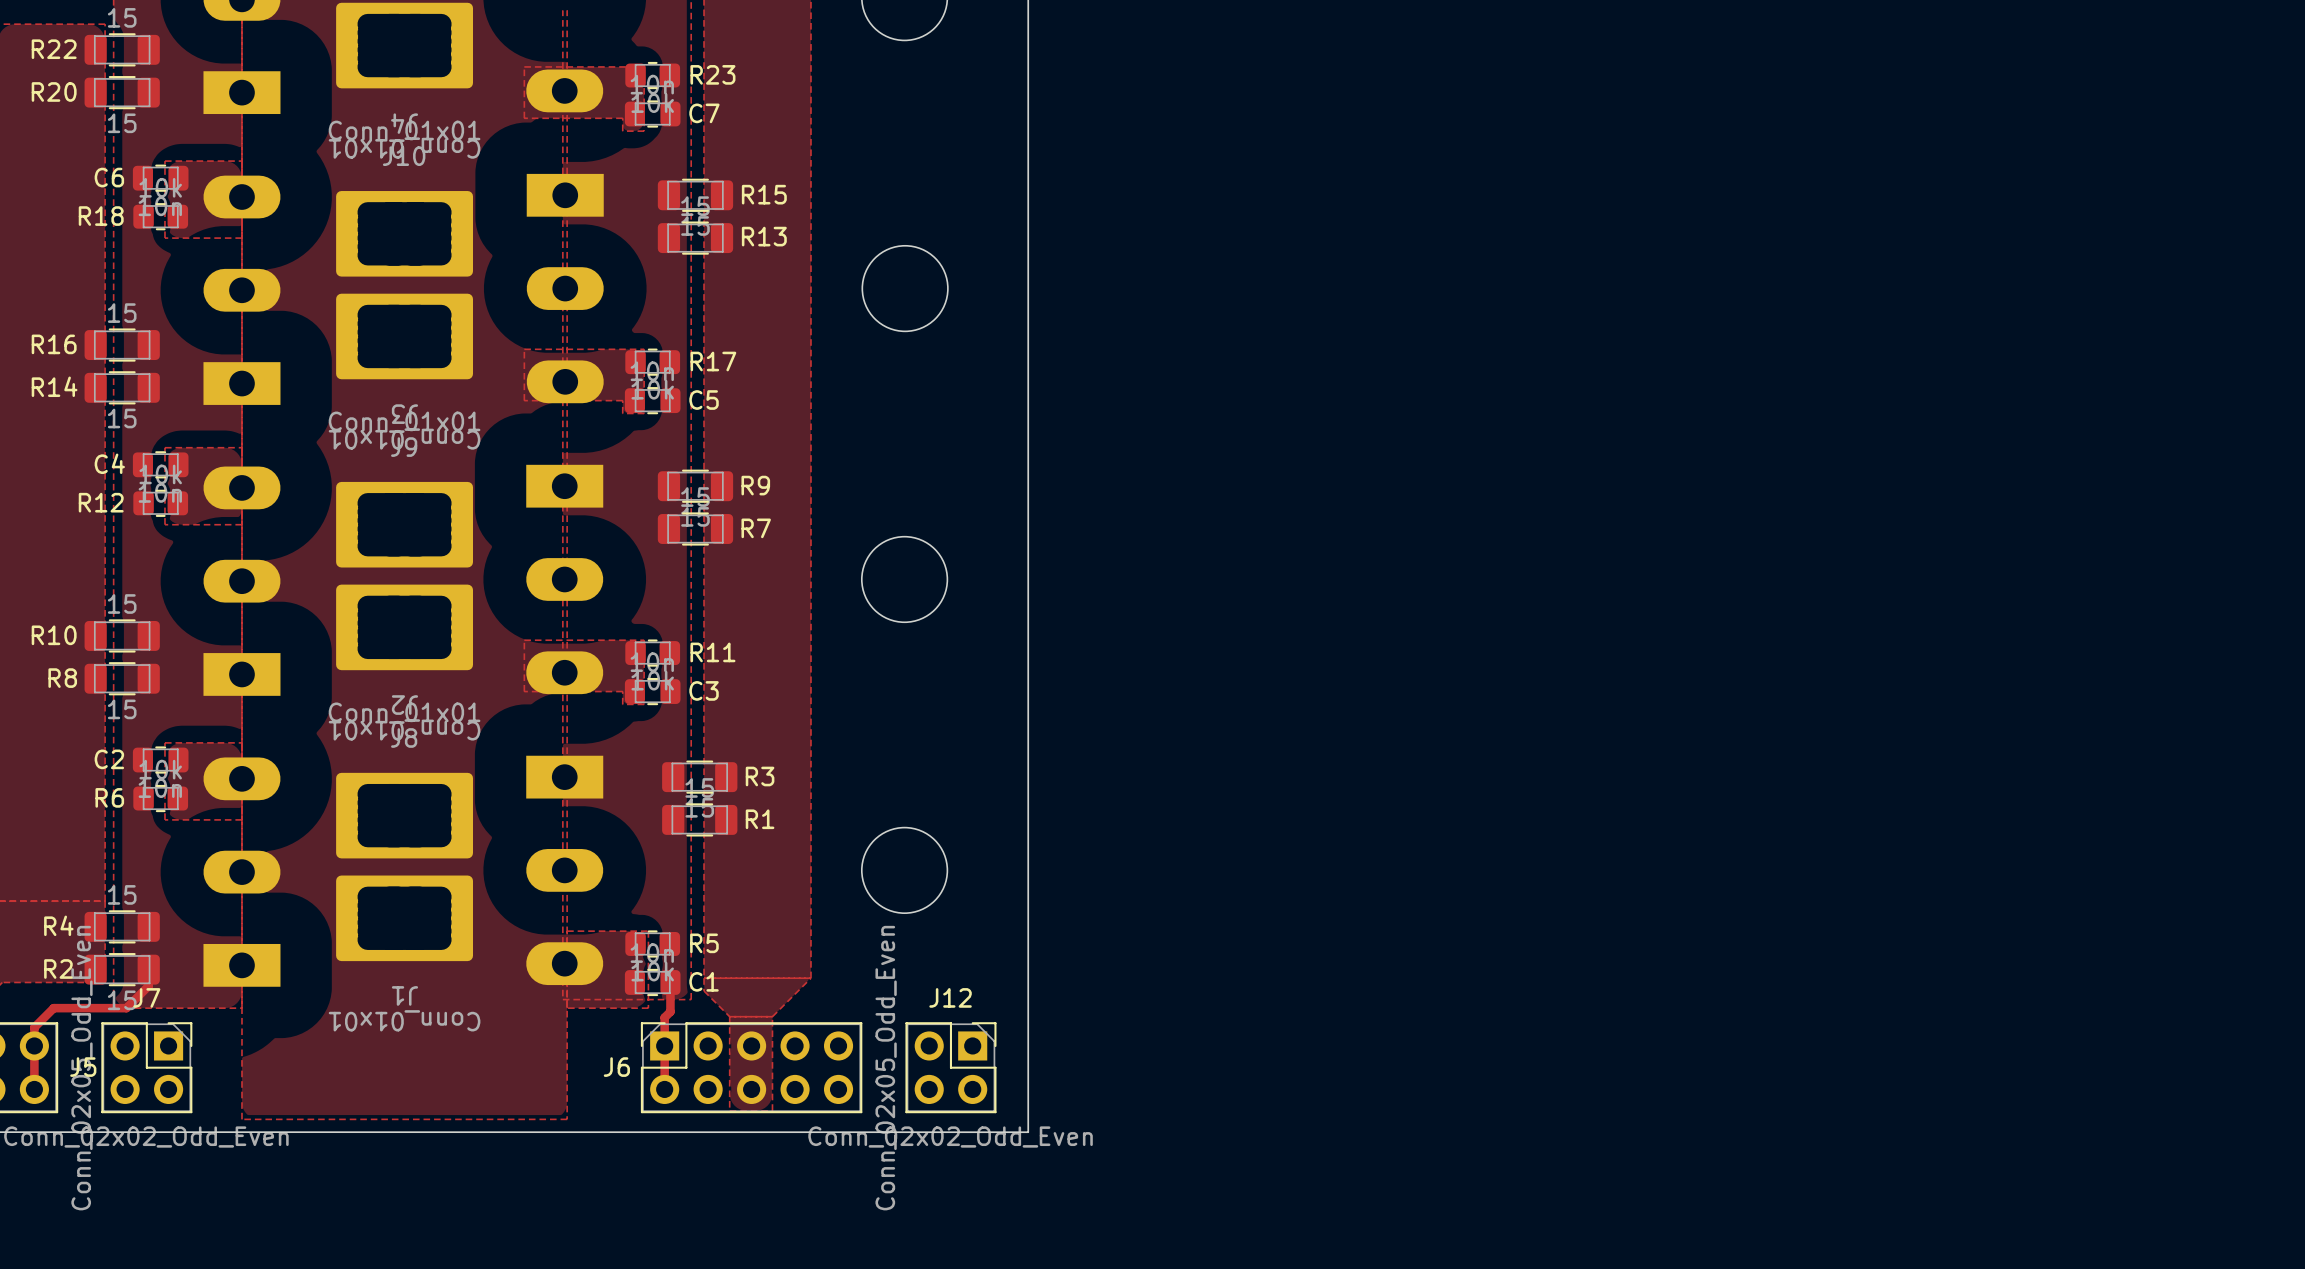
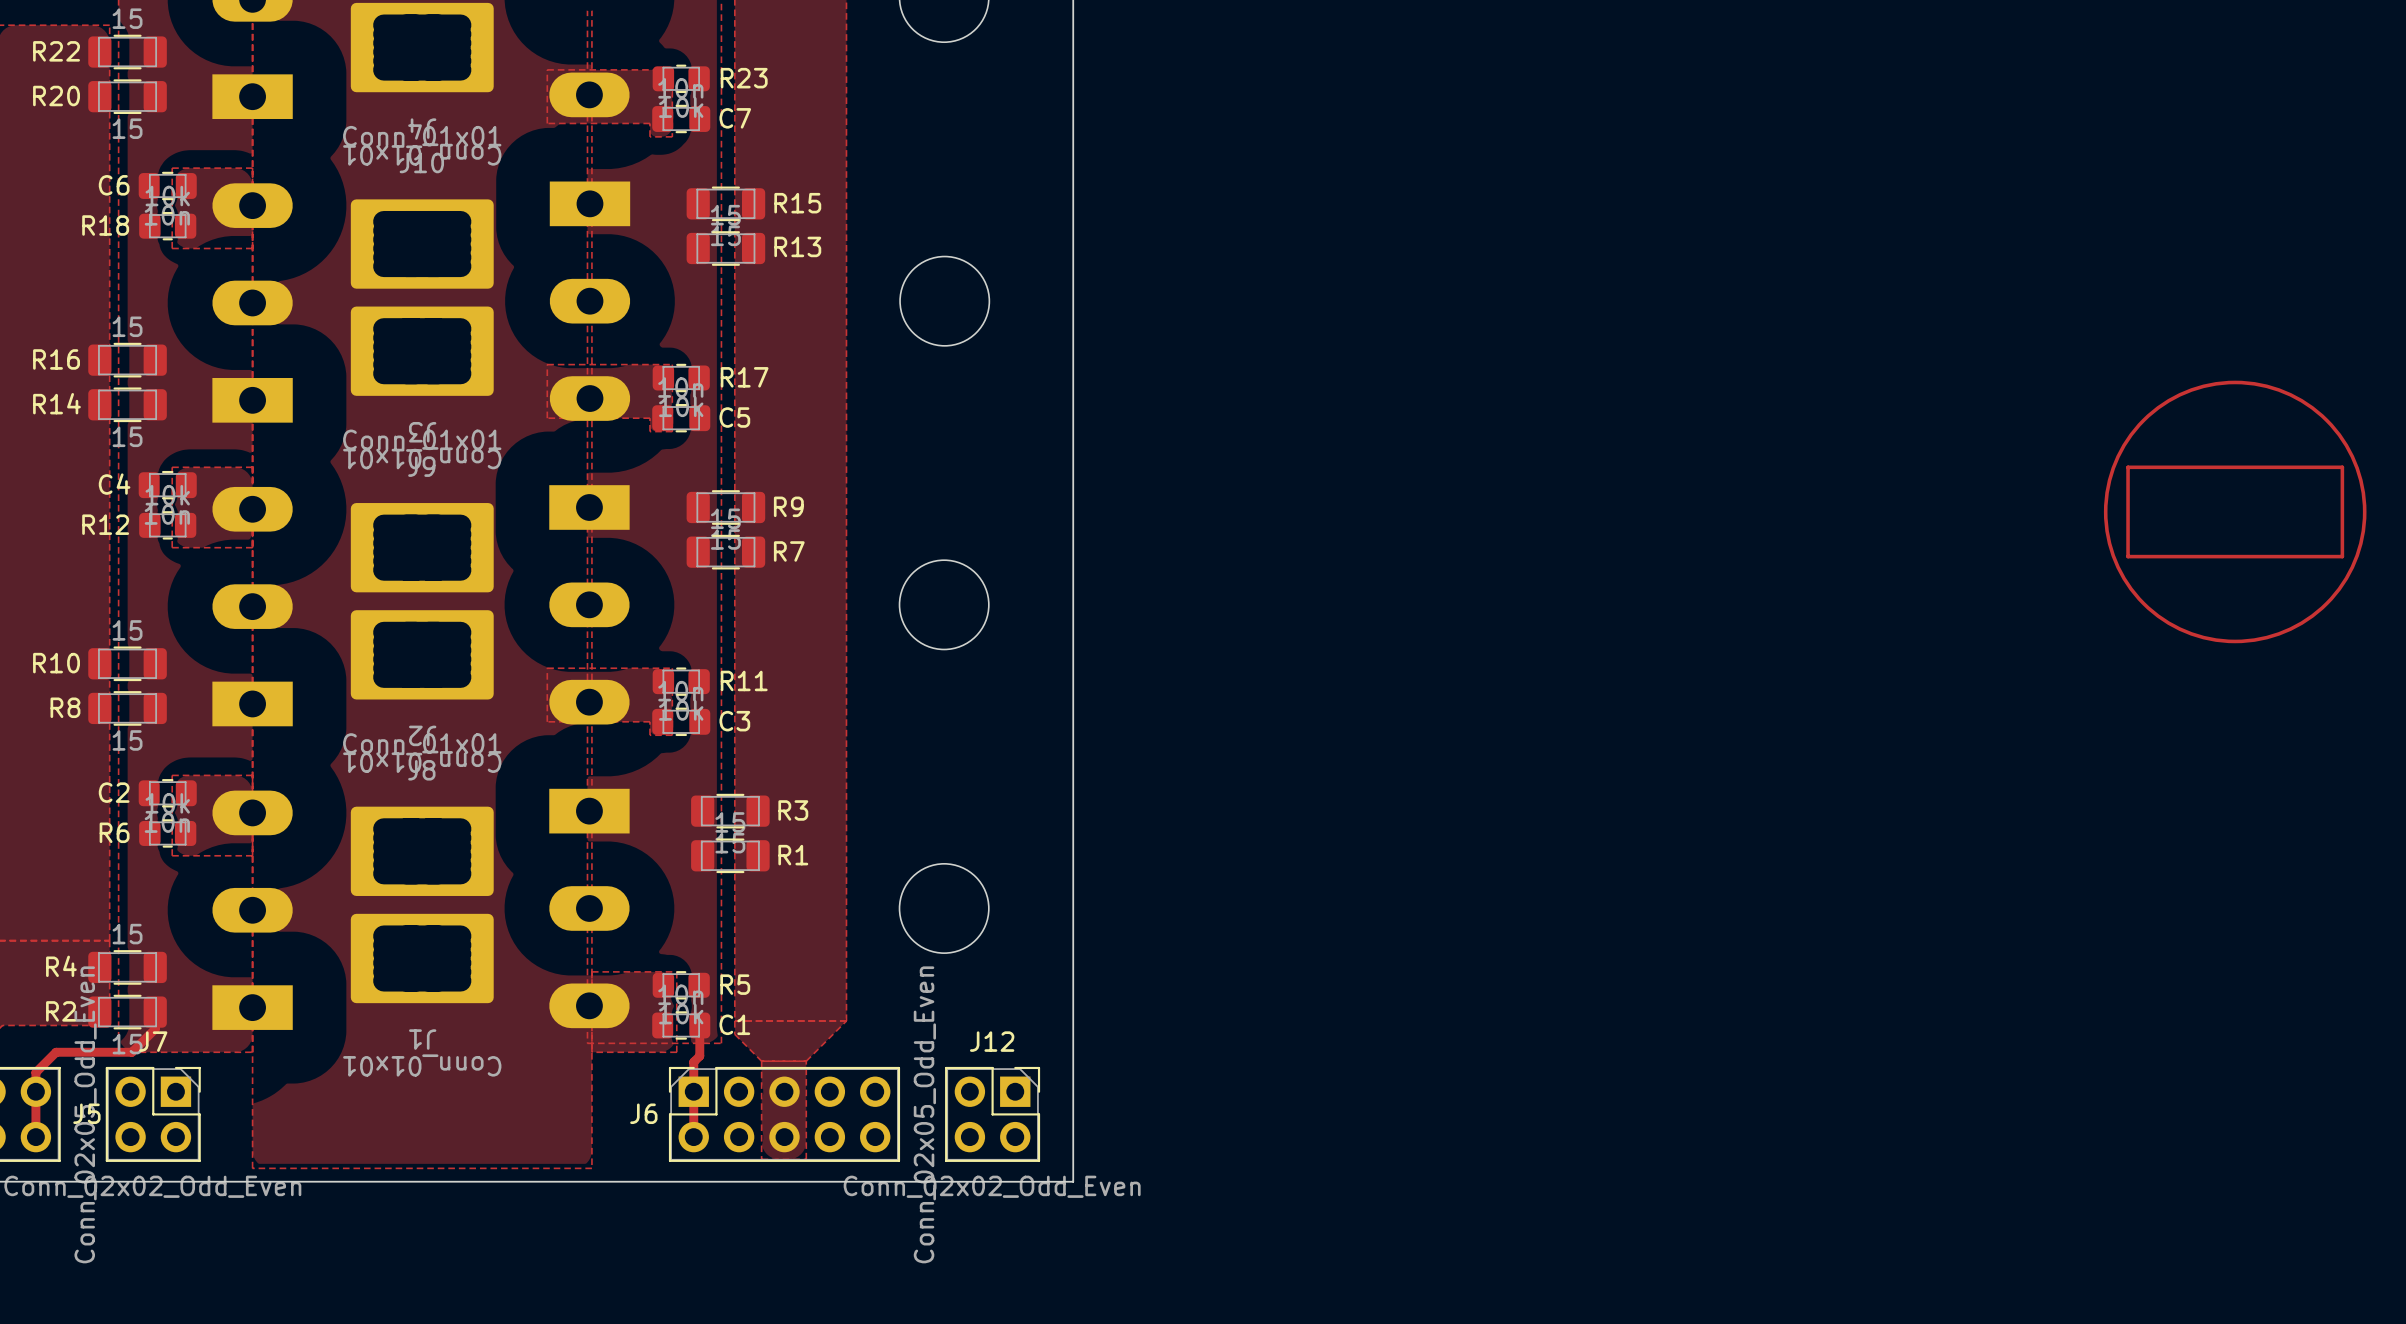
drawing: none -> [2103, 380, 2367, 644]
track: none -> (2128, 467) (2342, 467) (2342, 556) (2128, 556) (2128, 467)

